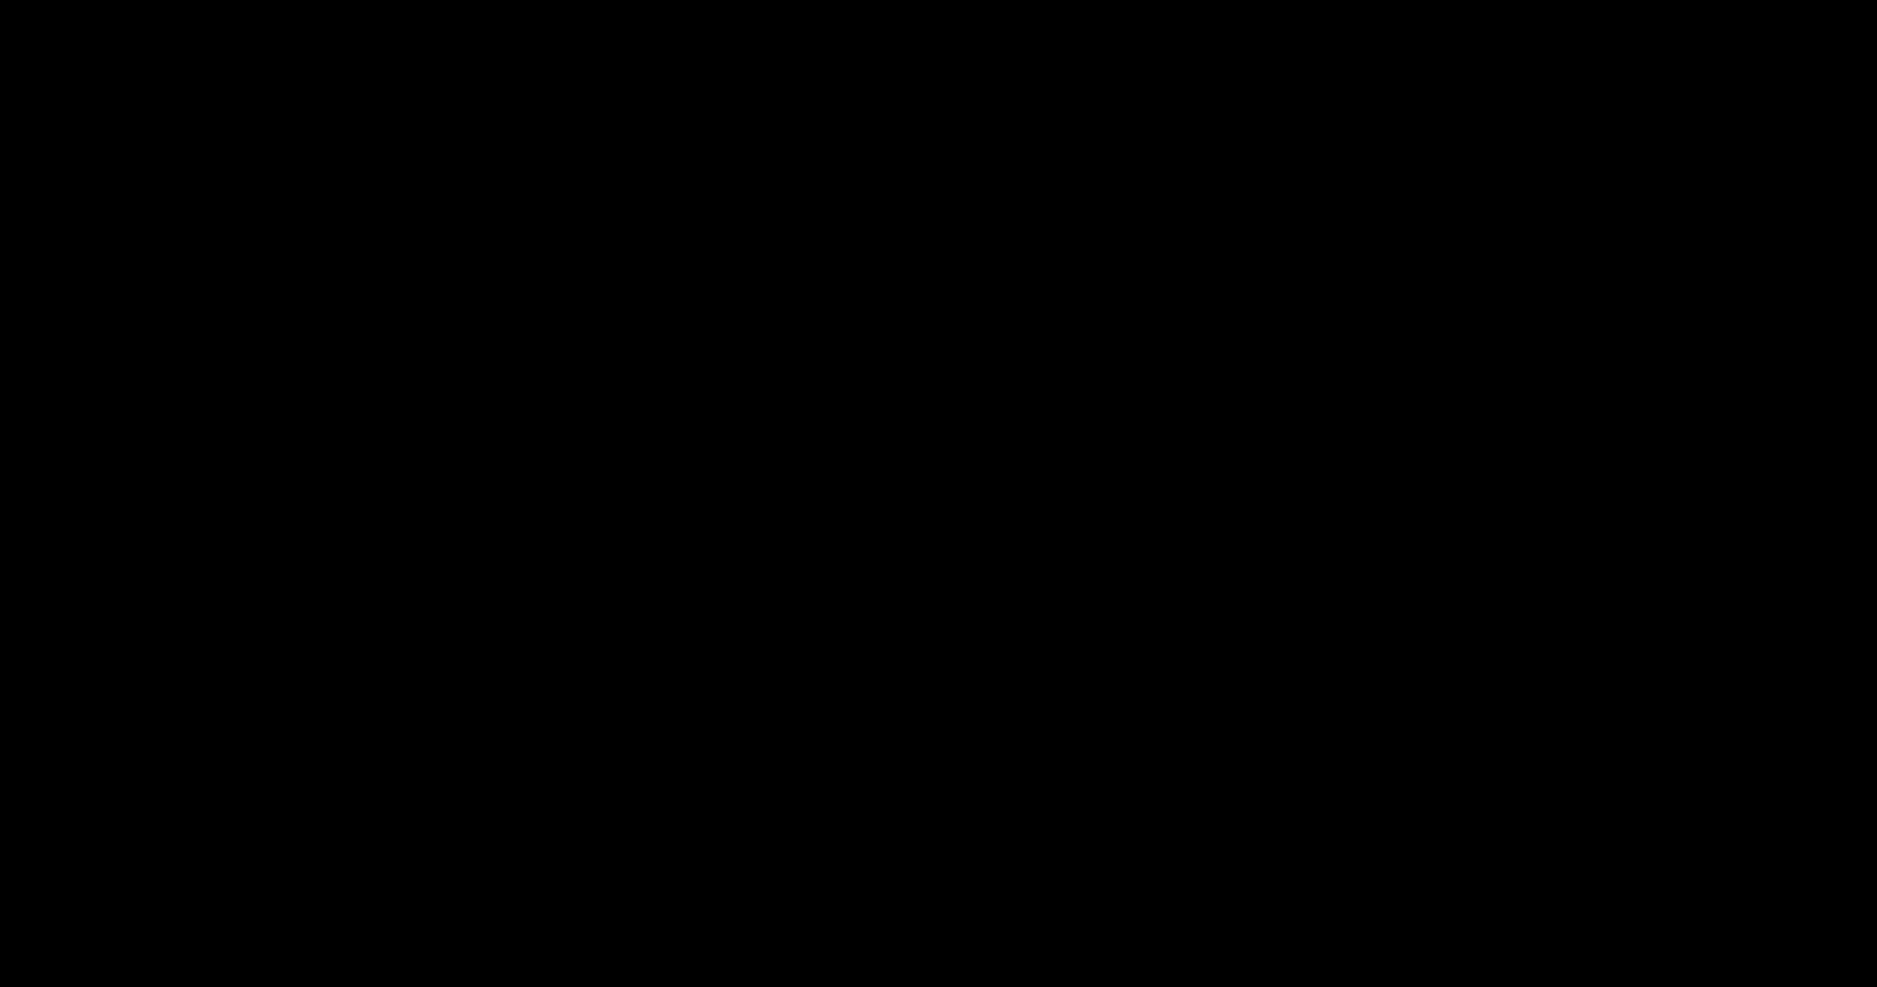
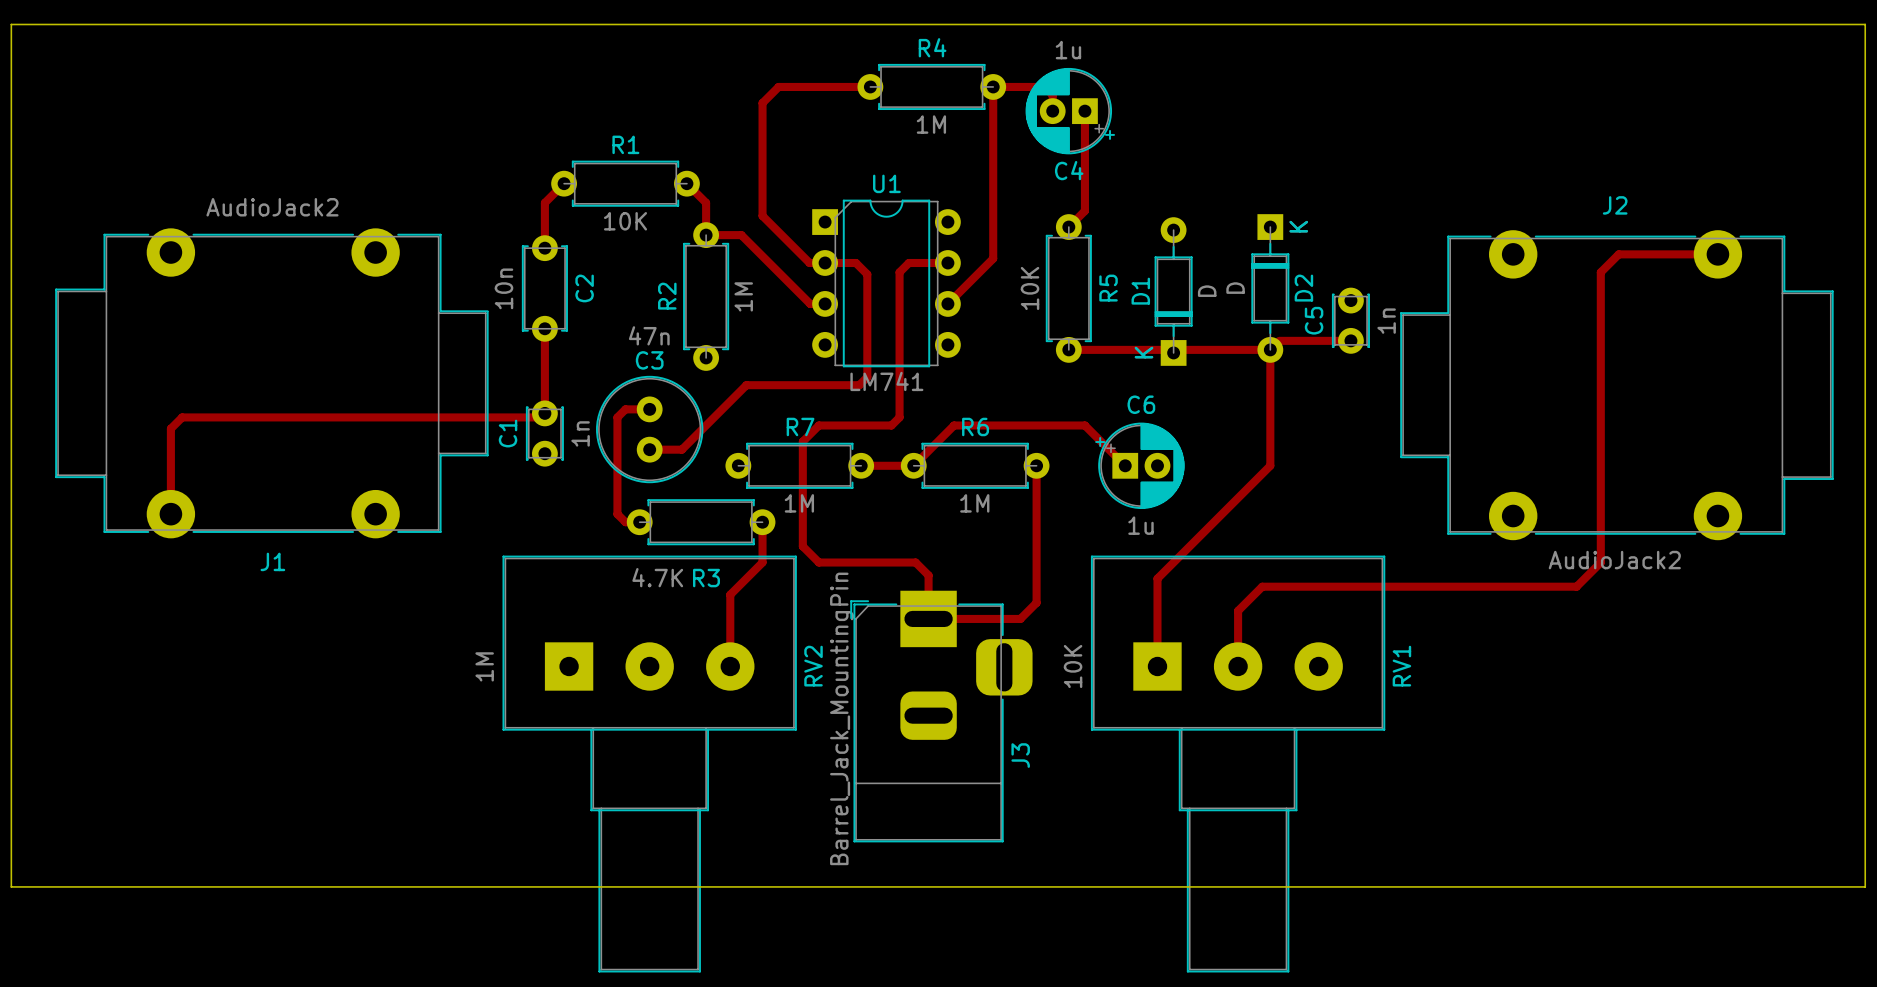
board edge: none -> (11, 24) (1865, 24) (1865, 886) (11, 886) (11, 24)
track: none -> (870, 86) (778, 86) (762, 103) (762, 215) (809, 262) (855, 262) (867, 274) (867, 377) (859, 385) (746, 385) (681, 449) (649, 449)
R4: none -> 1M (931, 86)
track: none -> (1052, 111) (1052, 95) (1044, 86) (993, 86) (993, 258) (947, 303)
C4: none -> 1u (1070, 111)
track: none -> (1084, 111) (1084, 210) (1068, 227)
track: none -> (564, 183) (544, 202) (544, 248)
R1: none -> 10K (625, 183)
track: none -> (686, 183) (706, 202) (706, 235) (741, 235) (810, 303) (825, 303)
track: none -> (1717, 254) (1618, 254) (1600, 272) (1600, 562) (1576, 586) (1262, 586) (1238, 610) (1238, 667)
track: none -> (947, 262) (908, 262) (899, 272) (899, 417) (891, 425) (818, 425) (802, 441) (802, 546) (818, 562) (915, 562) (928, 575) (928, 618)
U1: none -> LM741 (886, 283)
C2: none -> 10n (544, 288)
R5: none -> 10K (1068, 288)
D2: none -> D (1270, 288)
D1: none -> D (1173, 291)
R2: none -> 1M (706, 296)
C5: none -> 1n (1350, 320)
track: none -> (544, 328) (544, 413) (540, 417) (182, 417) (170, 428) (170, 514)
track: none -> (1350, 340) (1279, 340) (1270, 349)
track: none -> (1068, 349) (1170, 349) (1173, 352) (1176, 349) (1270, 349)
track: none -> (1270, 349) (1270, 465) (1157, 578) (1157, 667)
J1: none -> AudioJack2 (271, 383)
J2: none -> AudioJack2 (1616, 385)
track: none -> (649, 409) (625, 409) (617, 417) (617, 514) (625, 522) (639, 522)
C3: none -> 47n (649, 429)
C1: none -> 1n (544, 433)
R7: none -> 1M (799, 465)
track: none -> (861, 465) (913, 465) (954, 425) (1084, 425) (1125, 465)
R6: none -> 1M (975, 465)
track: none -> (1036, 465) (1036, 602) (1020, 618) (928, 618)
C6: none -> 1u (1139, 465)
R3: none -> 4.7K (701, 522)
track: none -> (762, 522) (762, 562) (730, 594) (730, 646)
J3: none -> Barrel_Jack_MountingPin (941, 716)
RV2: none -> 1M (649, 764)
RV1: none -> 10K (1238, 764)

